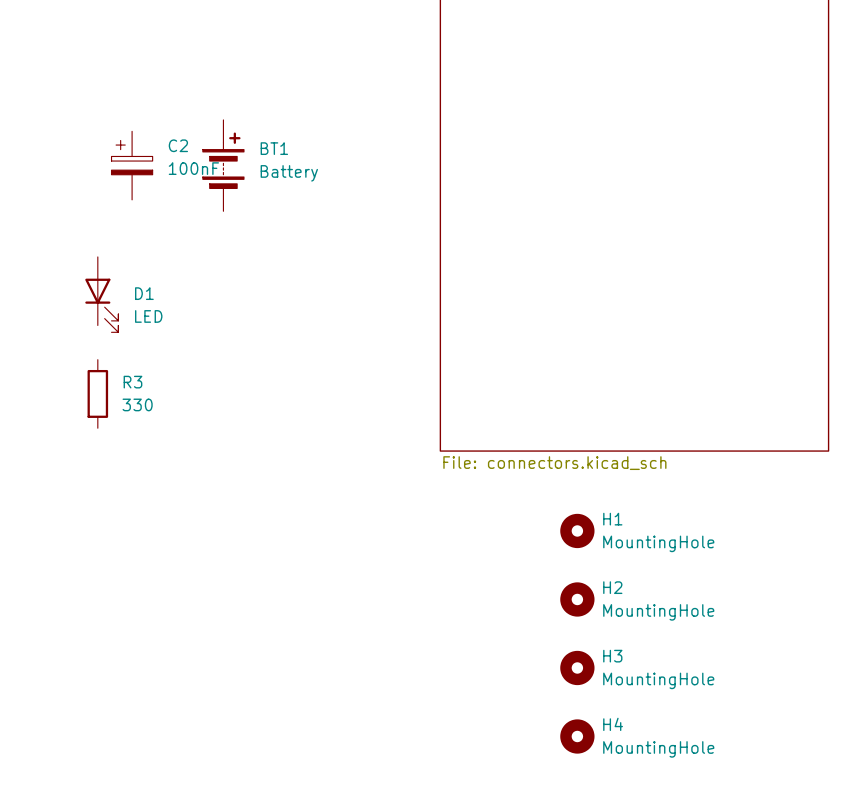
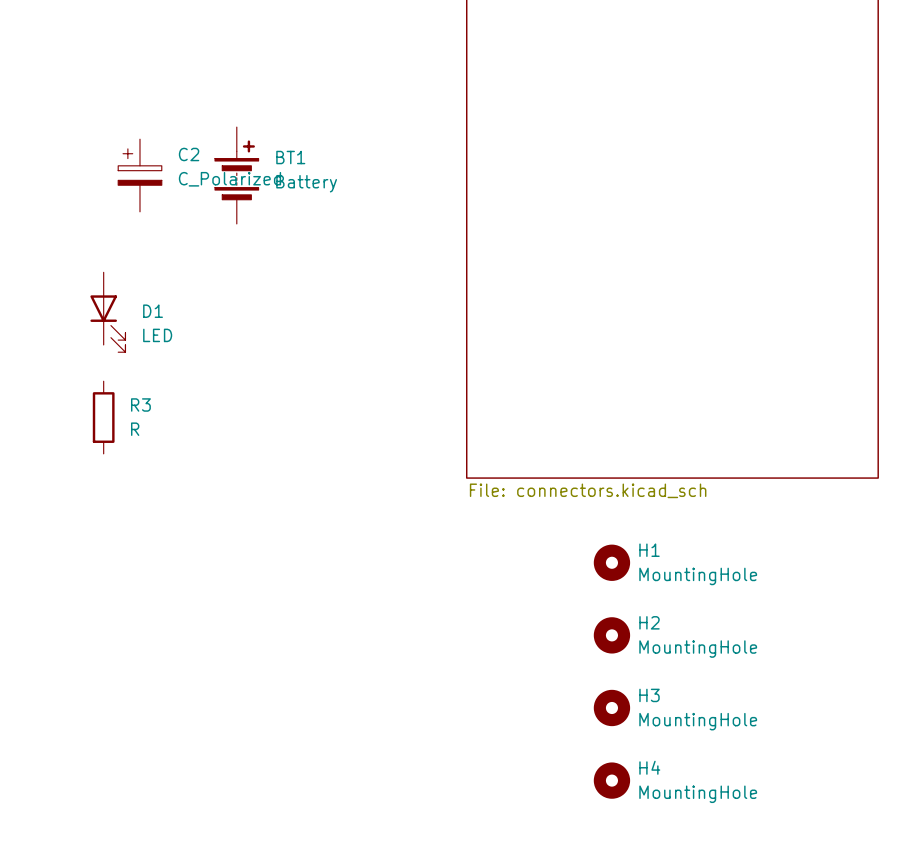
C2 value: 100nF (193, 168) -> C_Polarized (229, 179)
R3 value: 330 (137, 404) -> R (135, 429)

